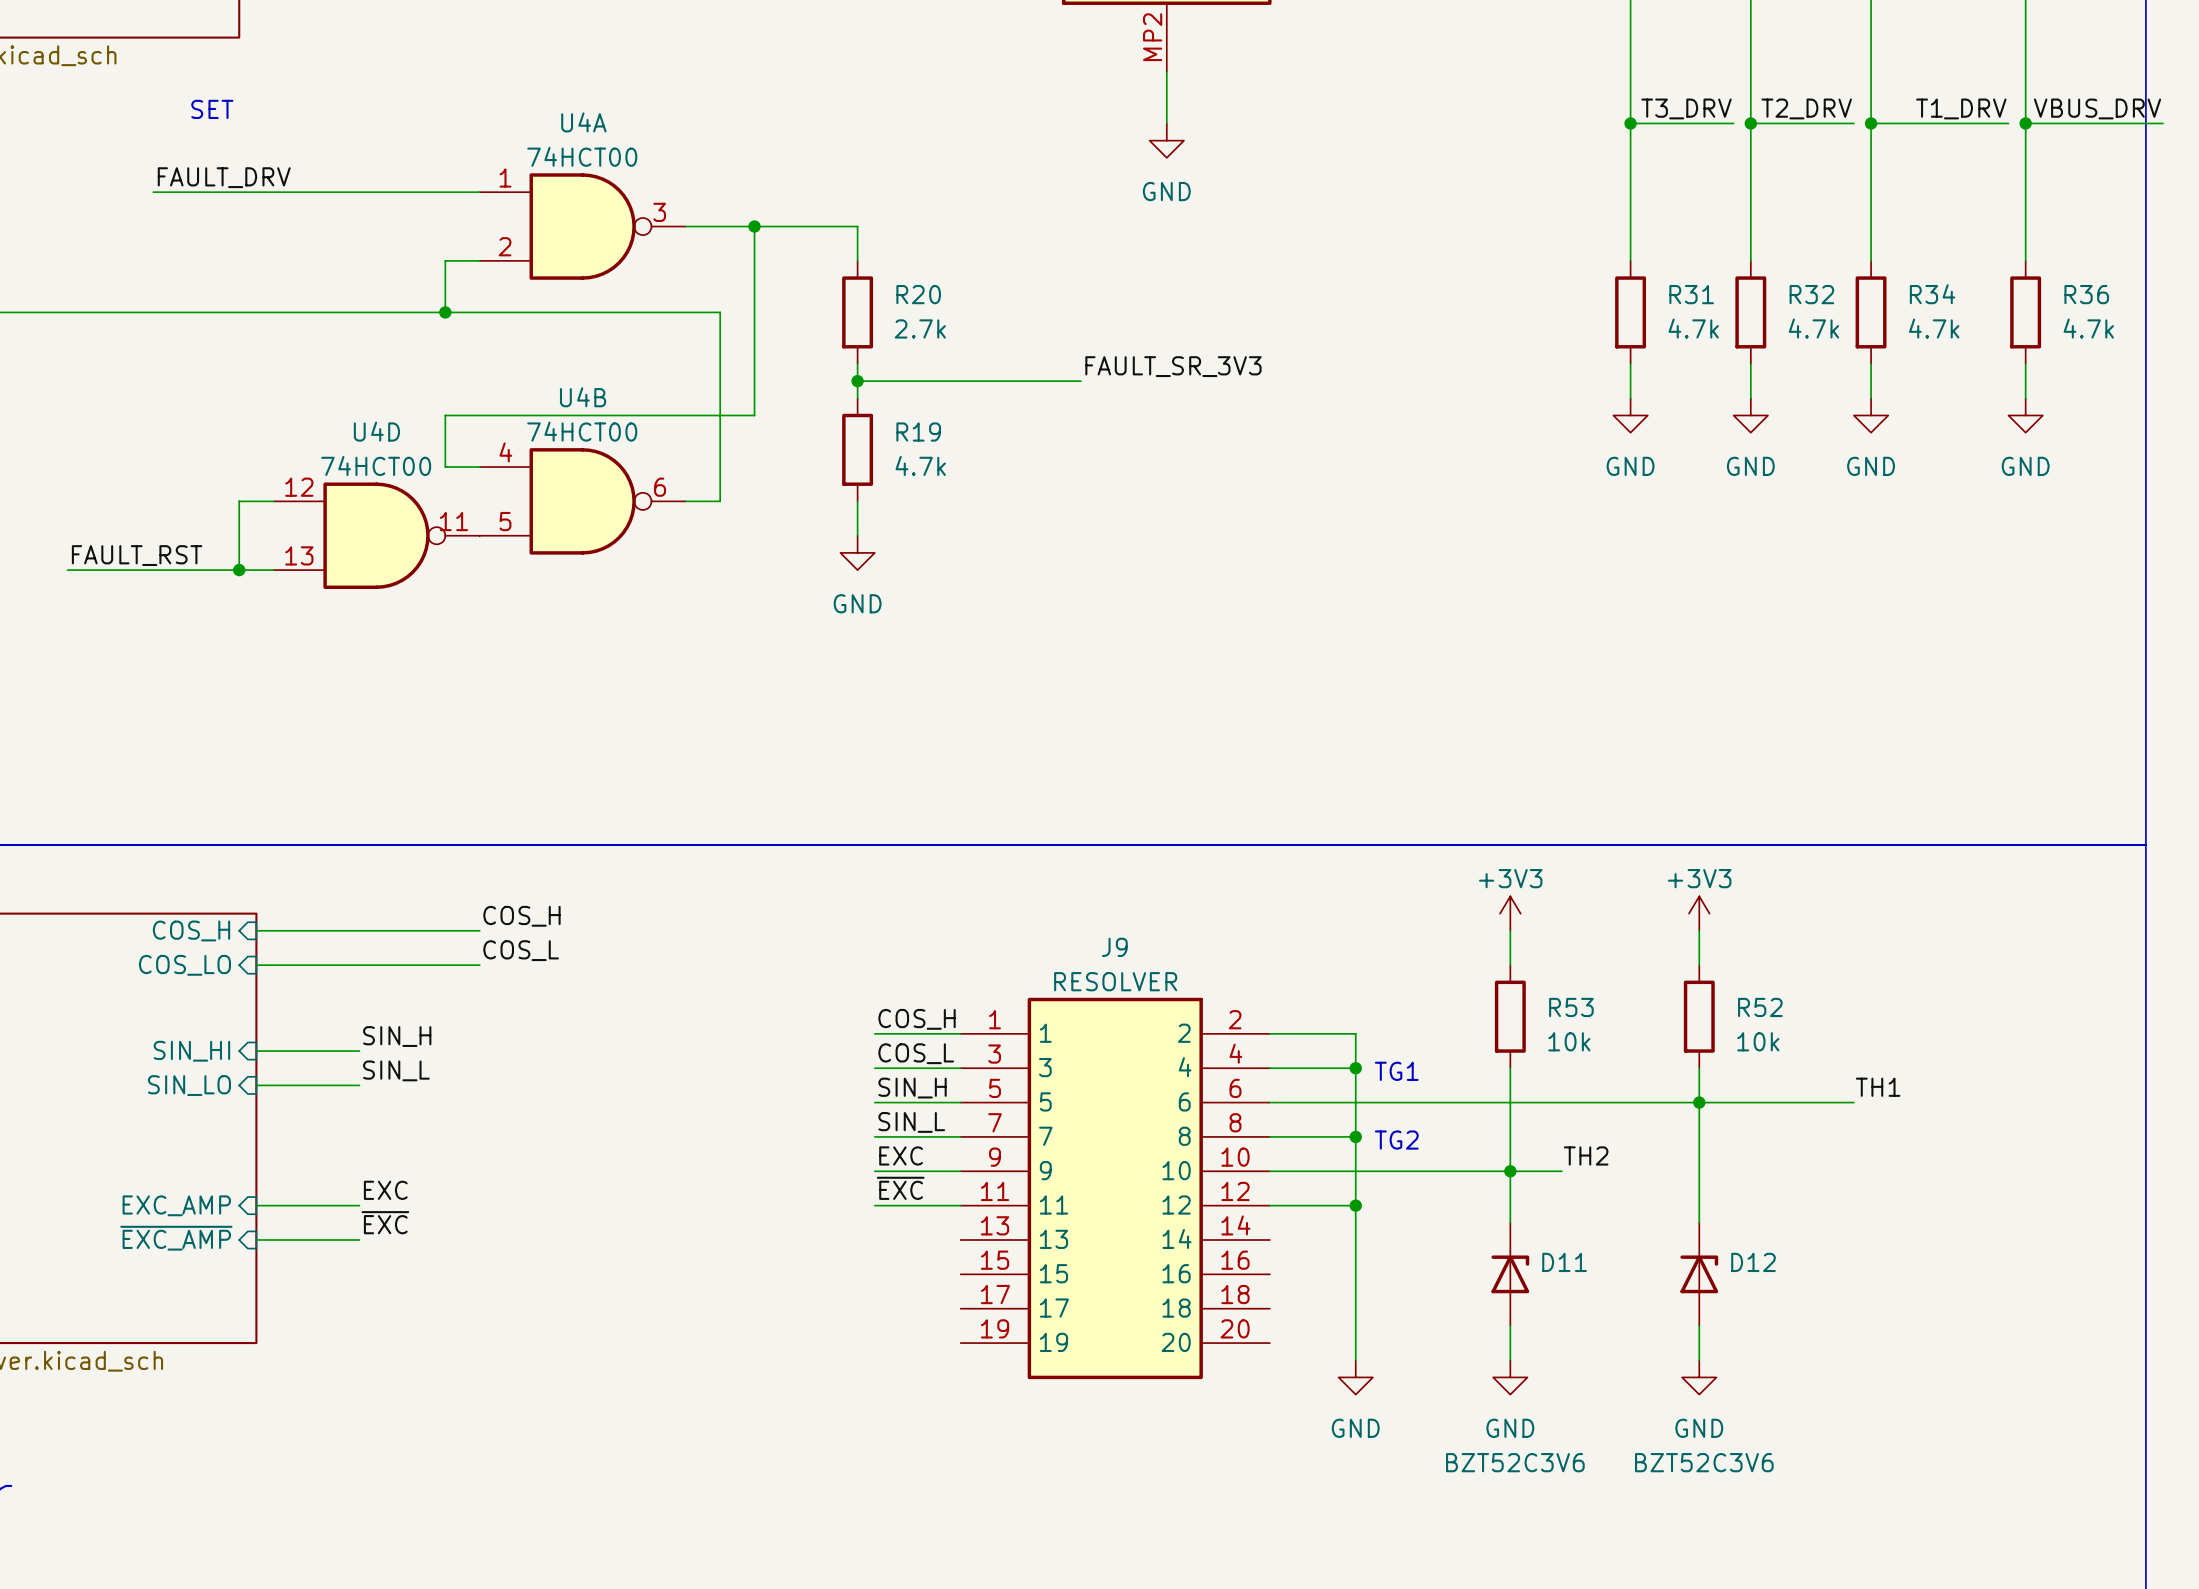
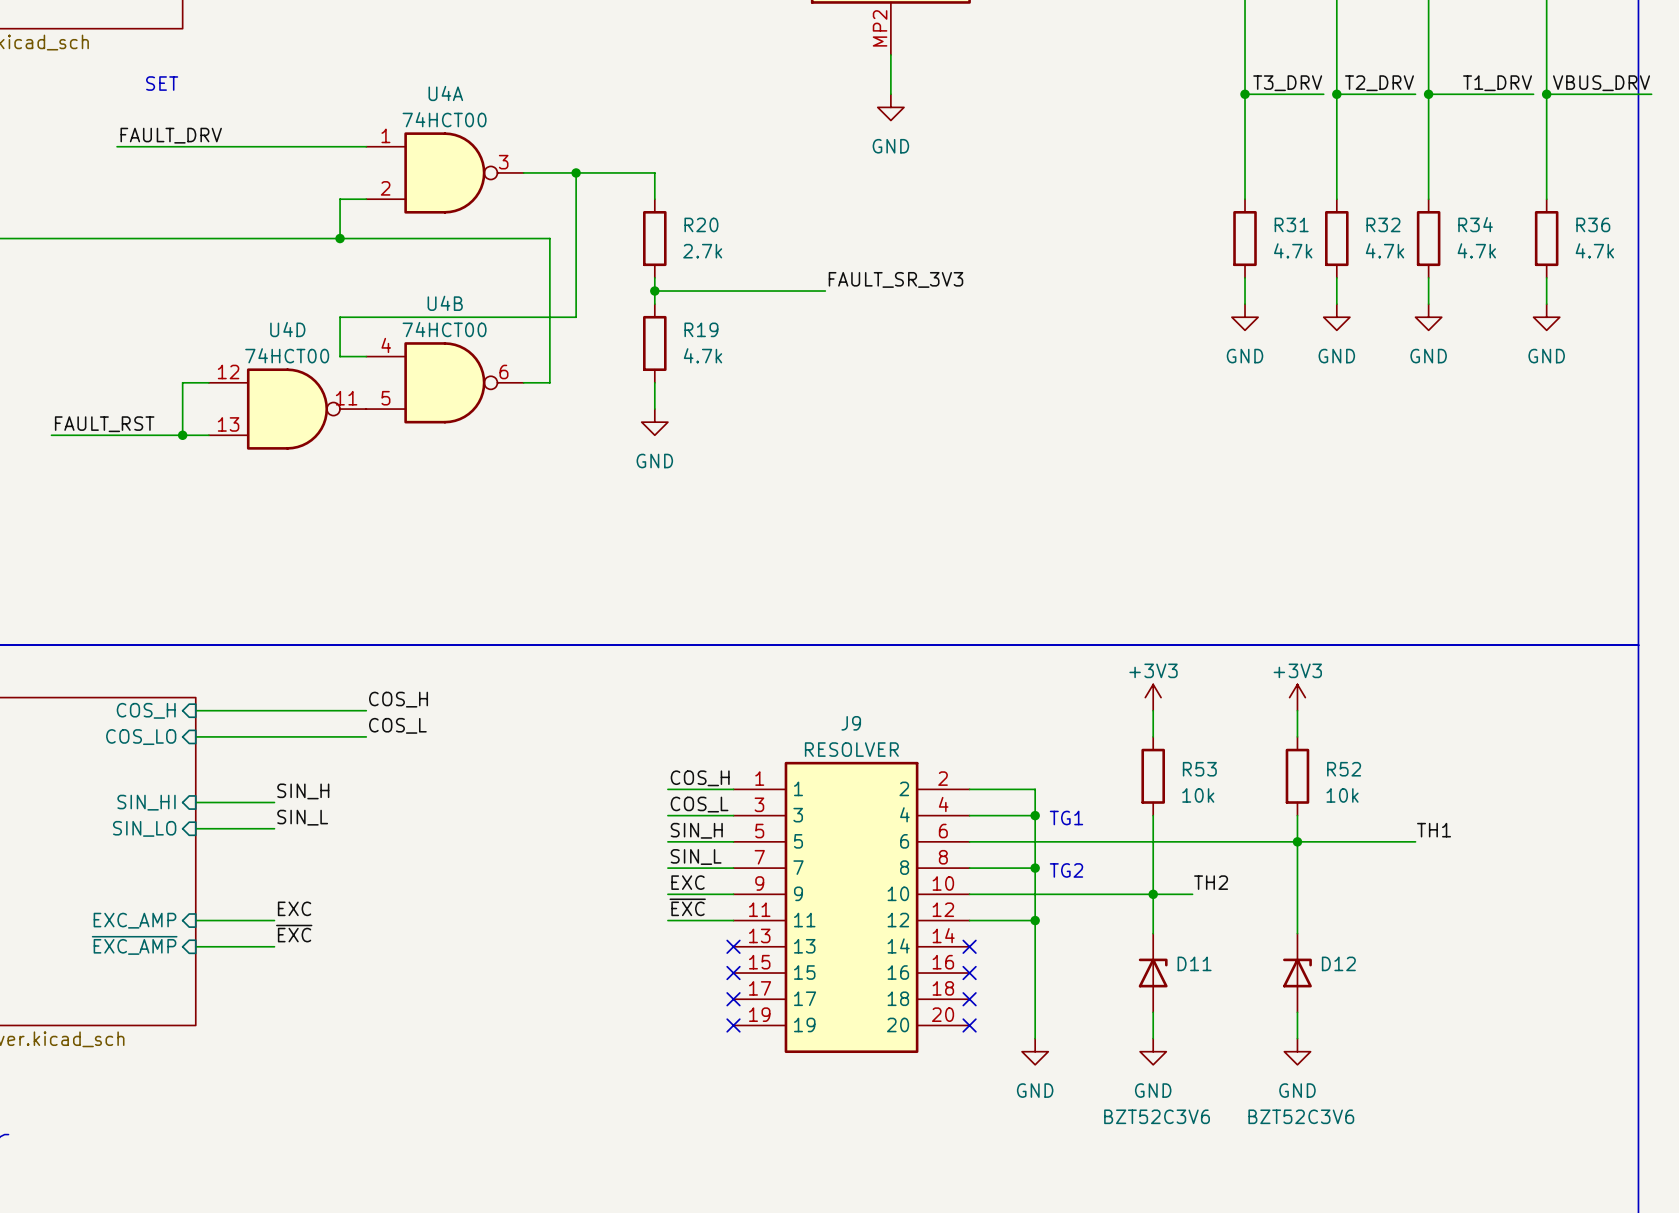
no-connect mark: none -> (733, 946)
no-connect mark: none -> (969, 946)
no-connect mark: none -> (733, 973)
no-connect mark: none -> (969, 973)
no-connect mark: none -> (733, 999)
no-connect mark: none -> (969, 999)
no-connect mark: none -> (733, 1025)
no-connect mark: none -> (969, 1025)

